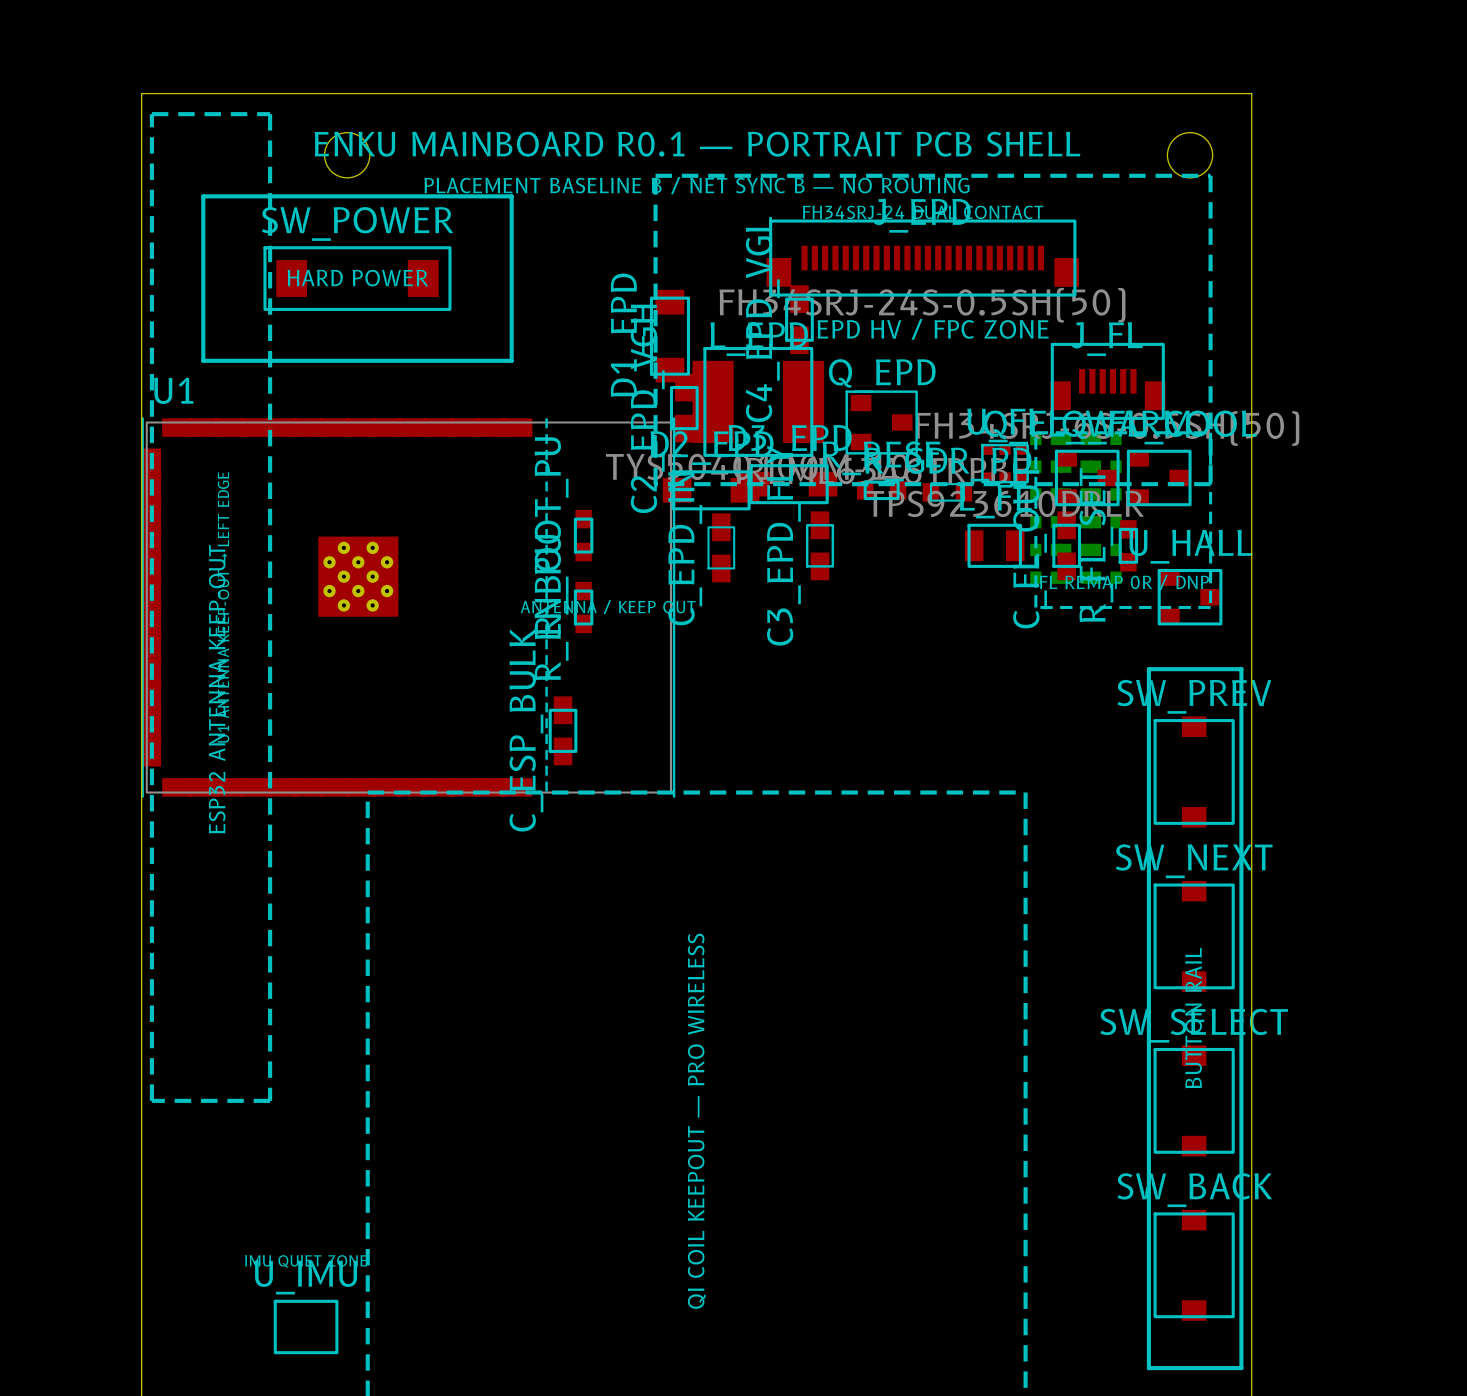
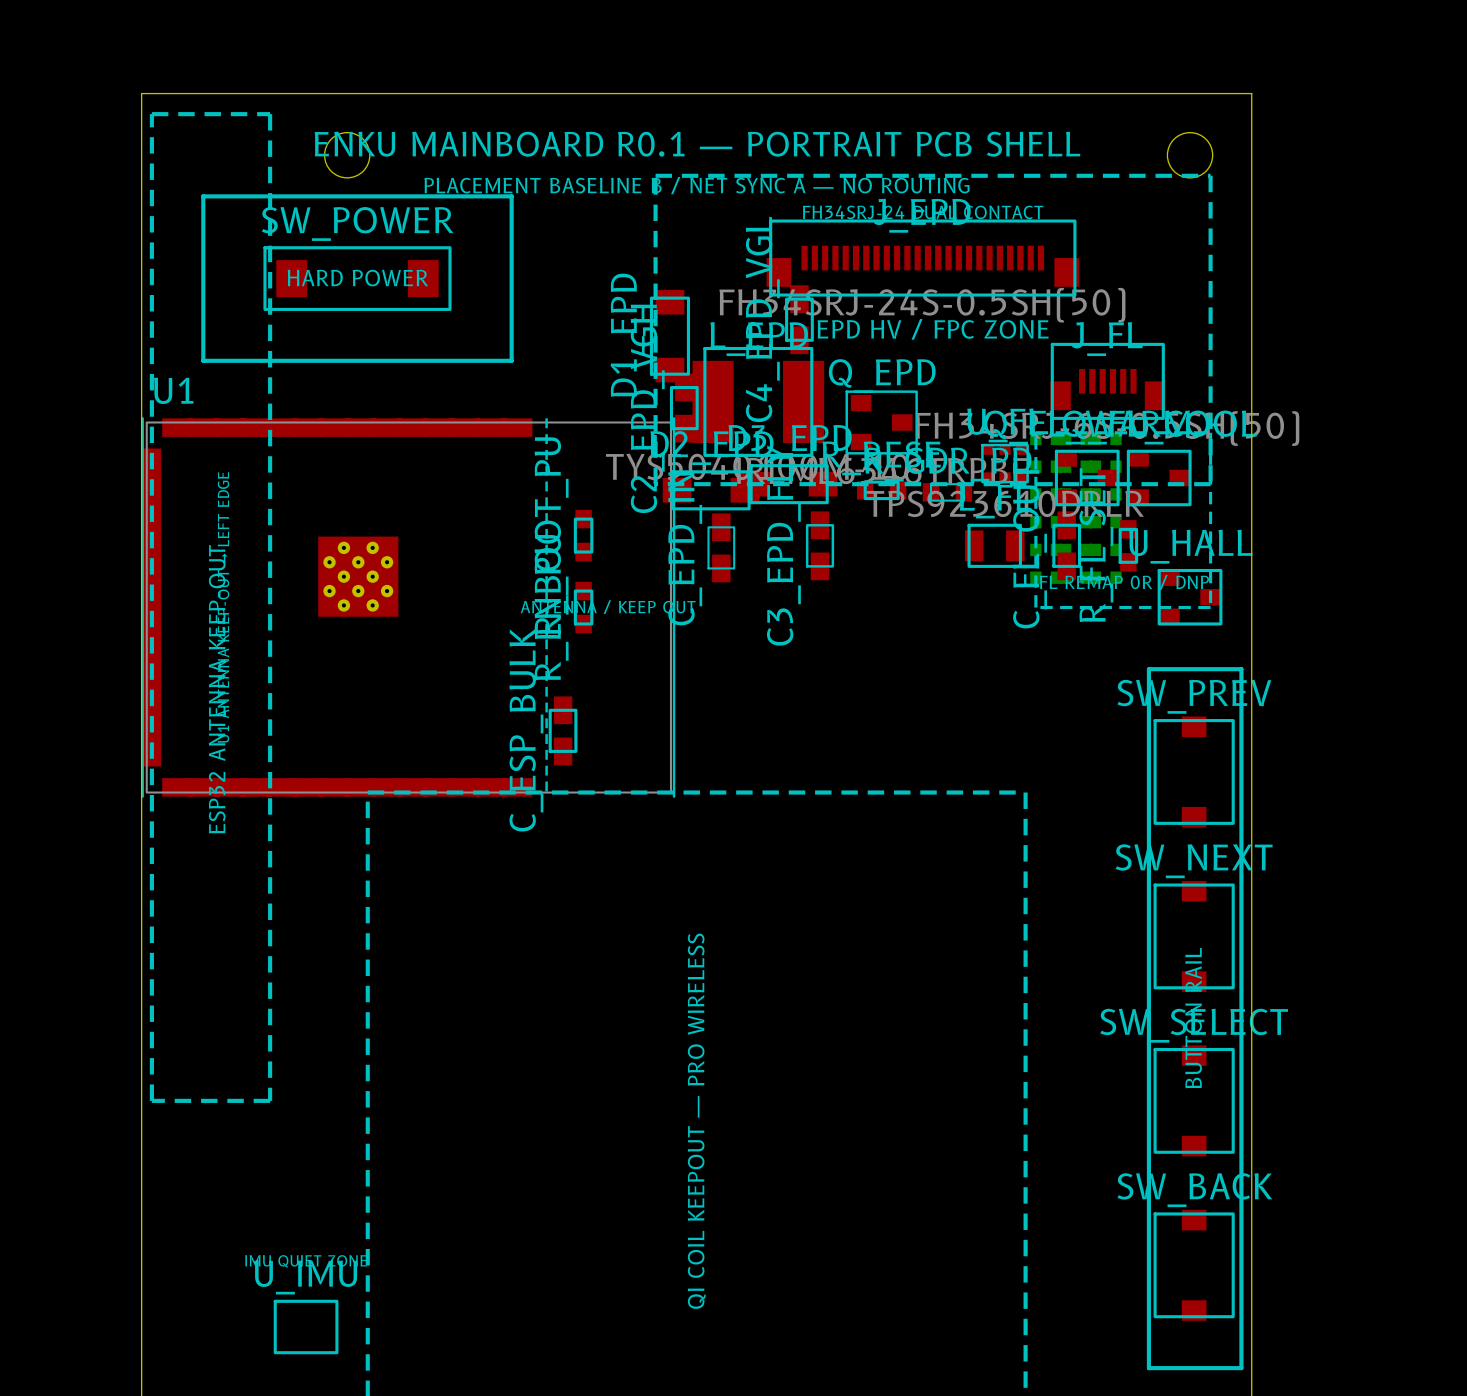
text: PLACEMENT BASELINE B / NET SYNC B — NO ROUTING (696, 185) -> PLACEMENT BASELINE B / NET SYNC A — NO ROUTING (696, 185)

